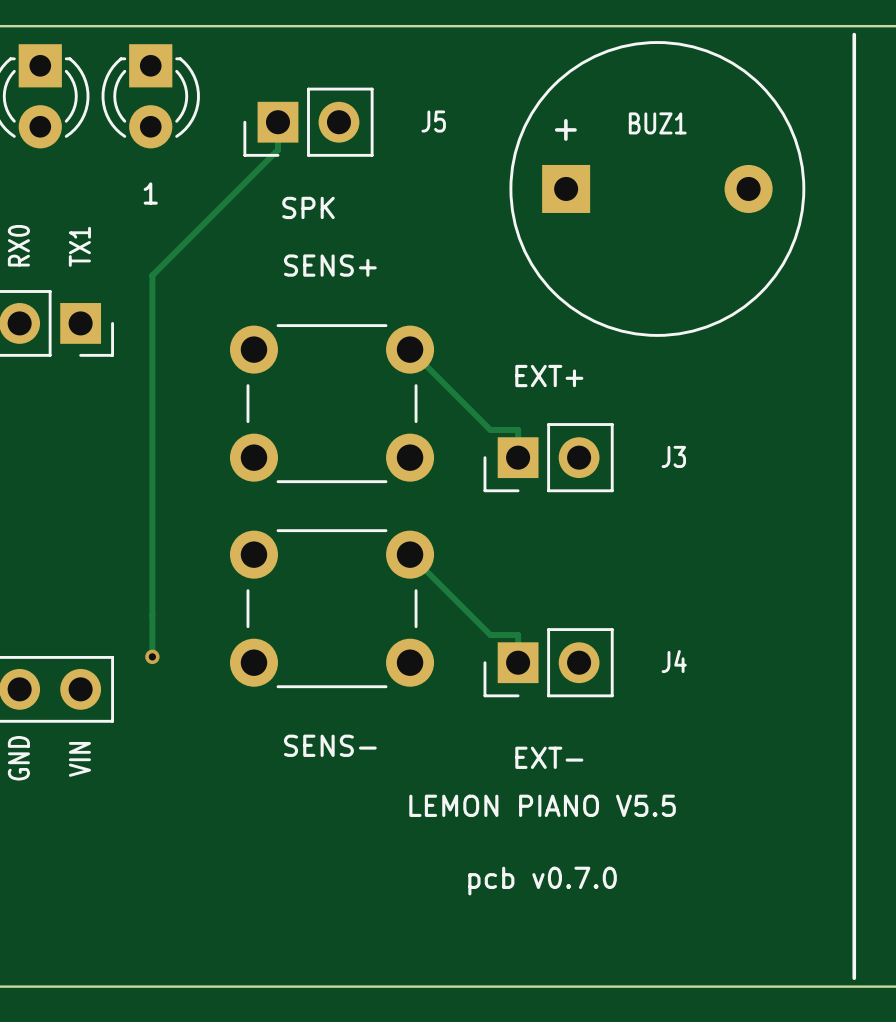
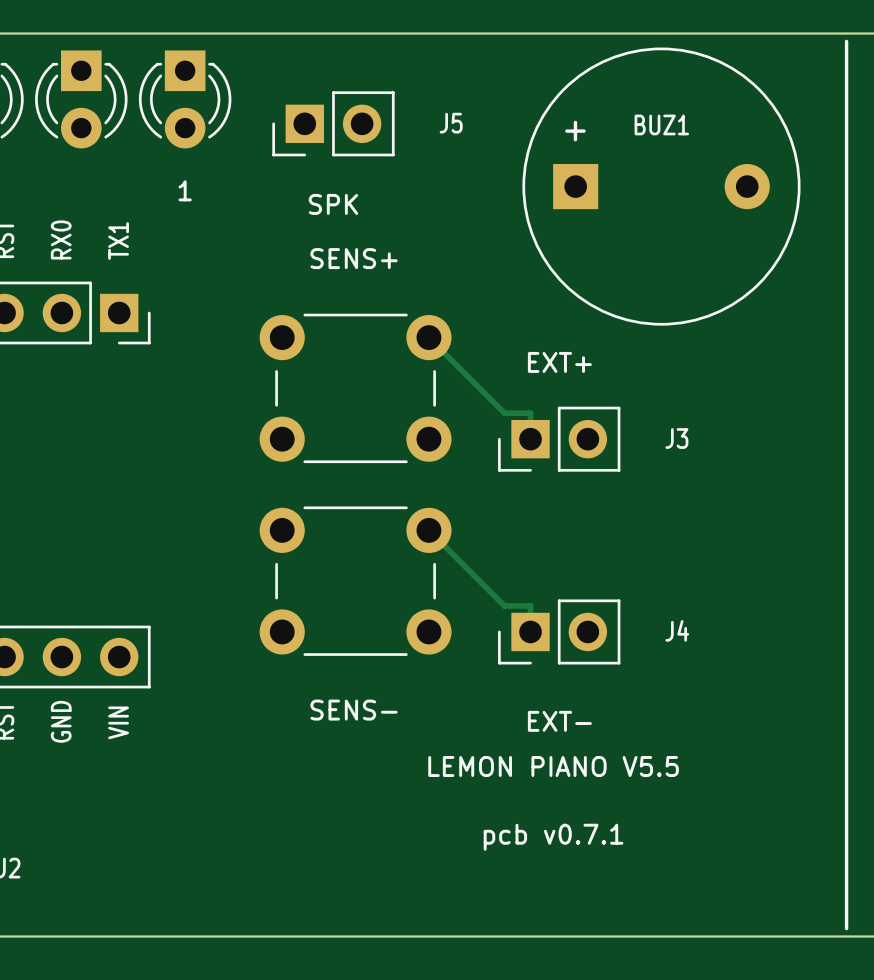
track: (277, 122) (277, 149) (152, 275) (152, 656) -> none
via: (152, 656) -> none
text: pcb v0.7.0 (542, 881) -> pcb v0.7.1 (553, 837)

